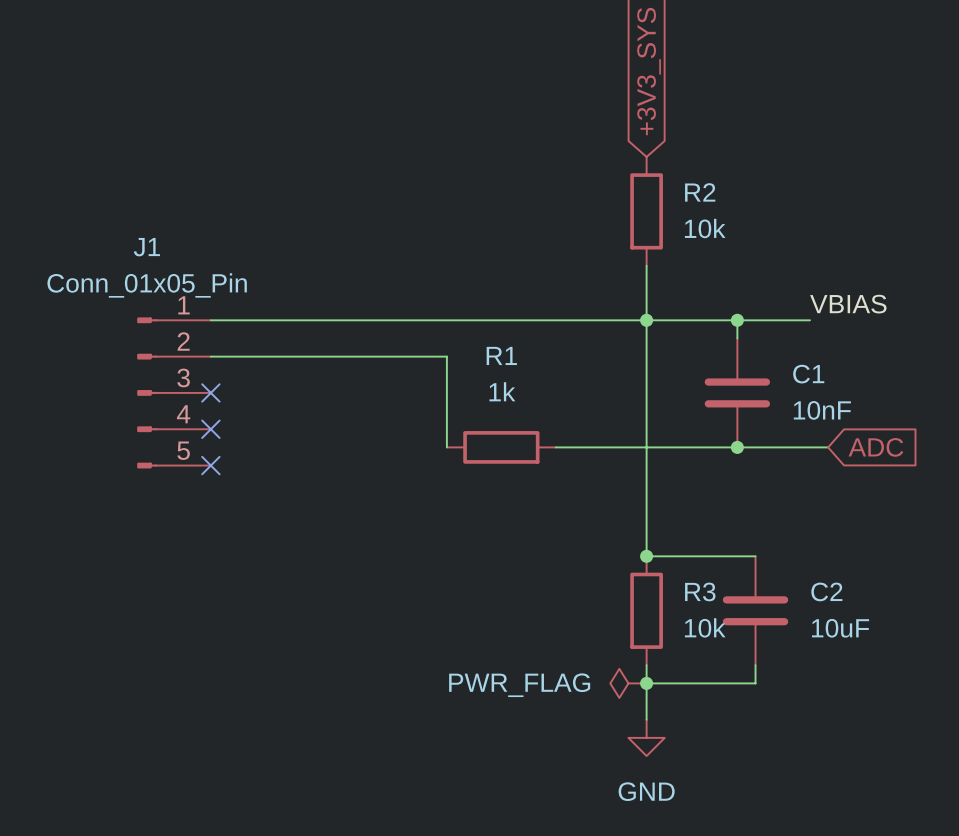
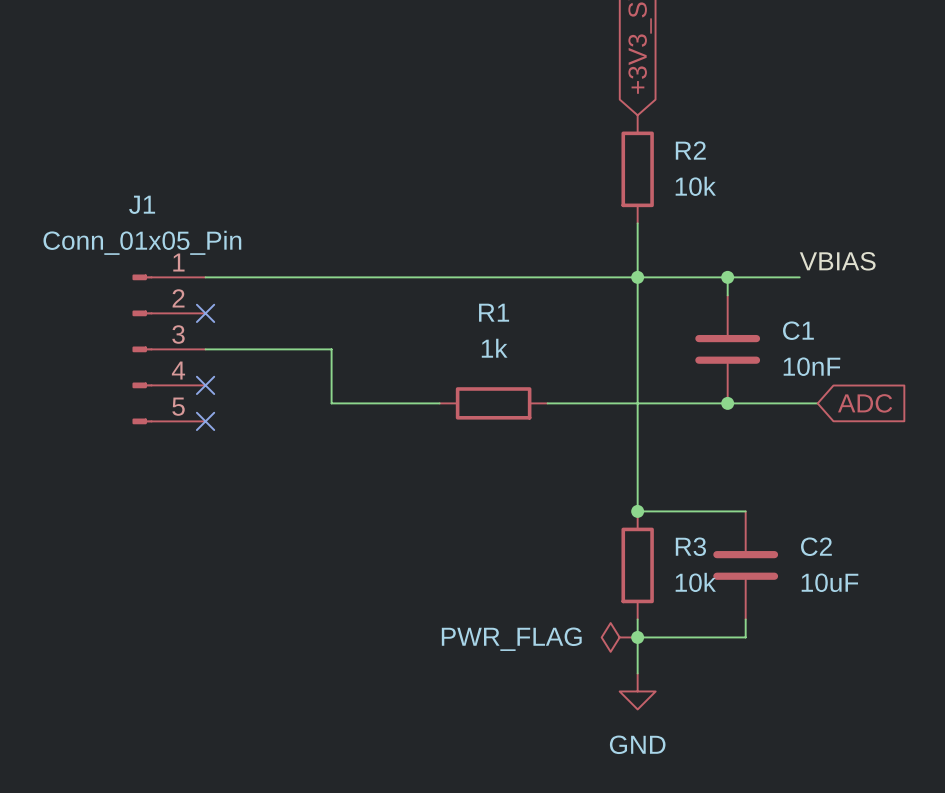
wire: (210, 356) (446, 356) (446, 447) -> (205, 349) (331, 349) (331, 403) (439, 403)
no-connect mark position: (210, 392) -> (205, 313)

